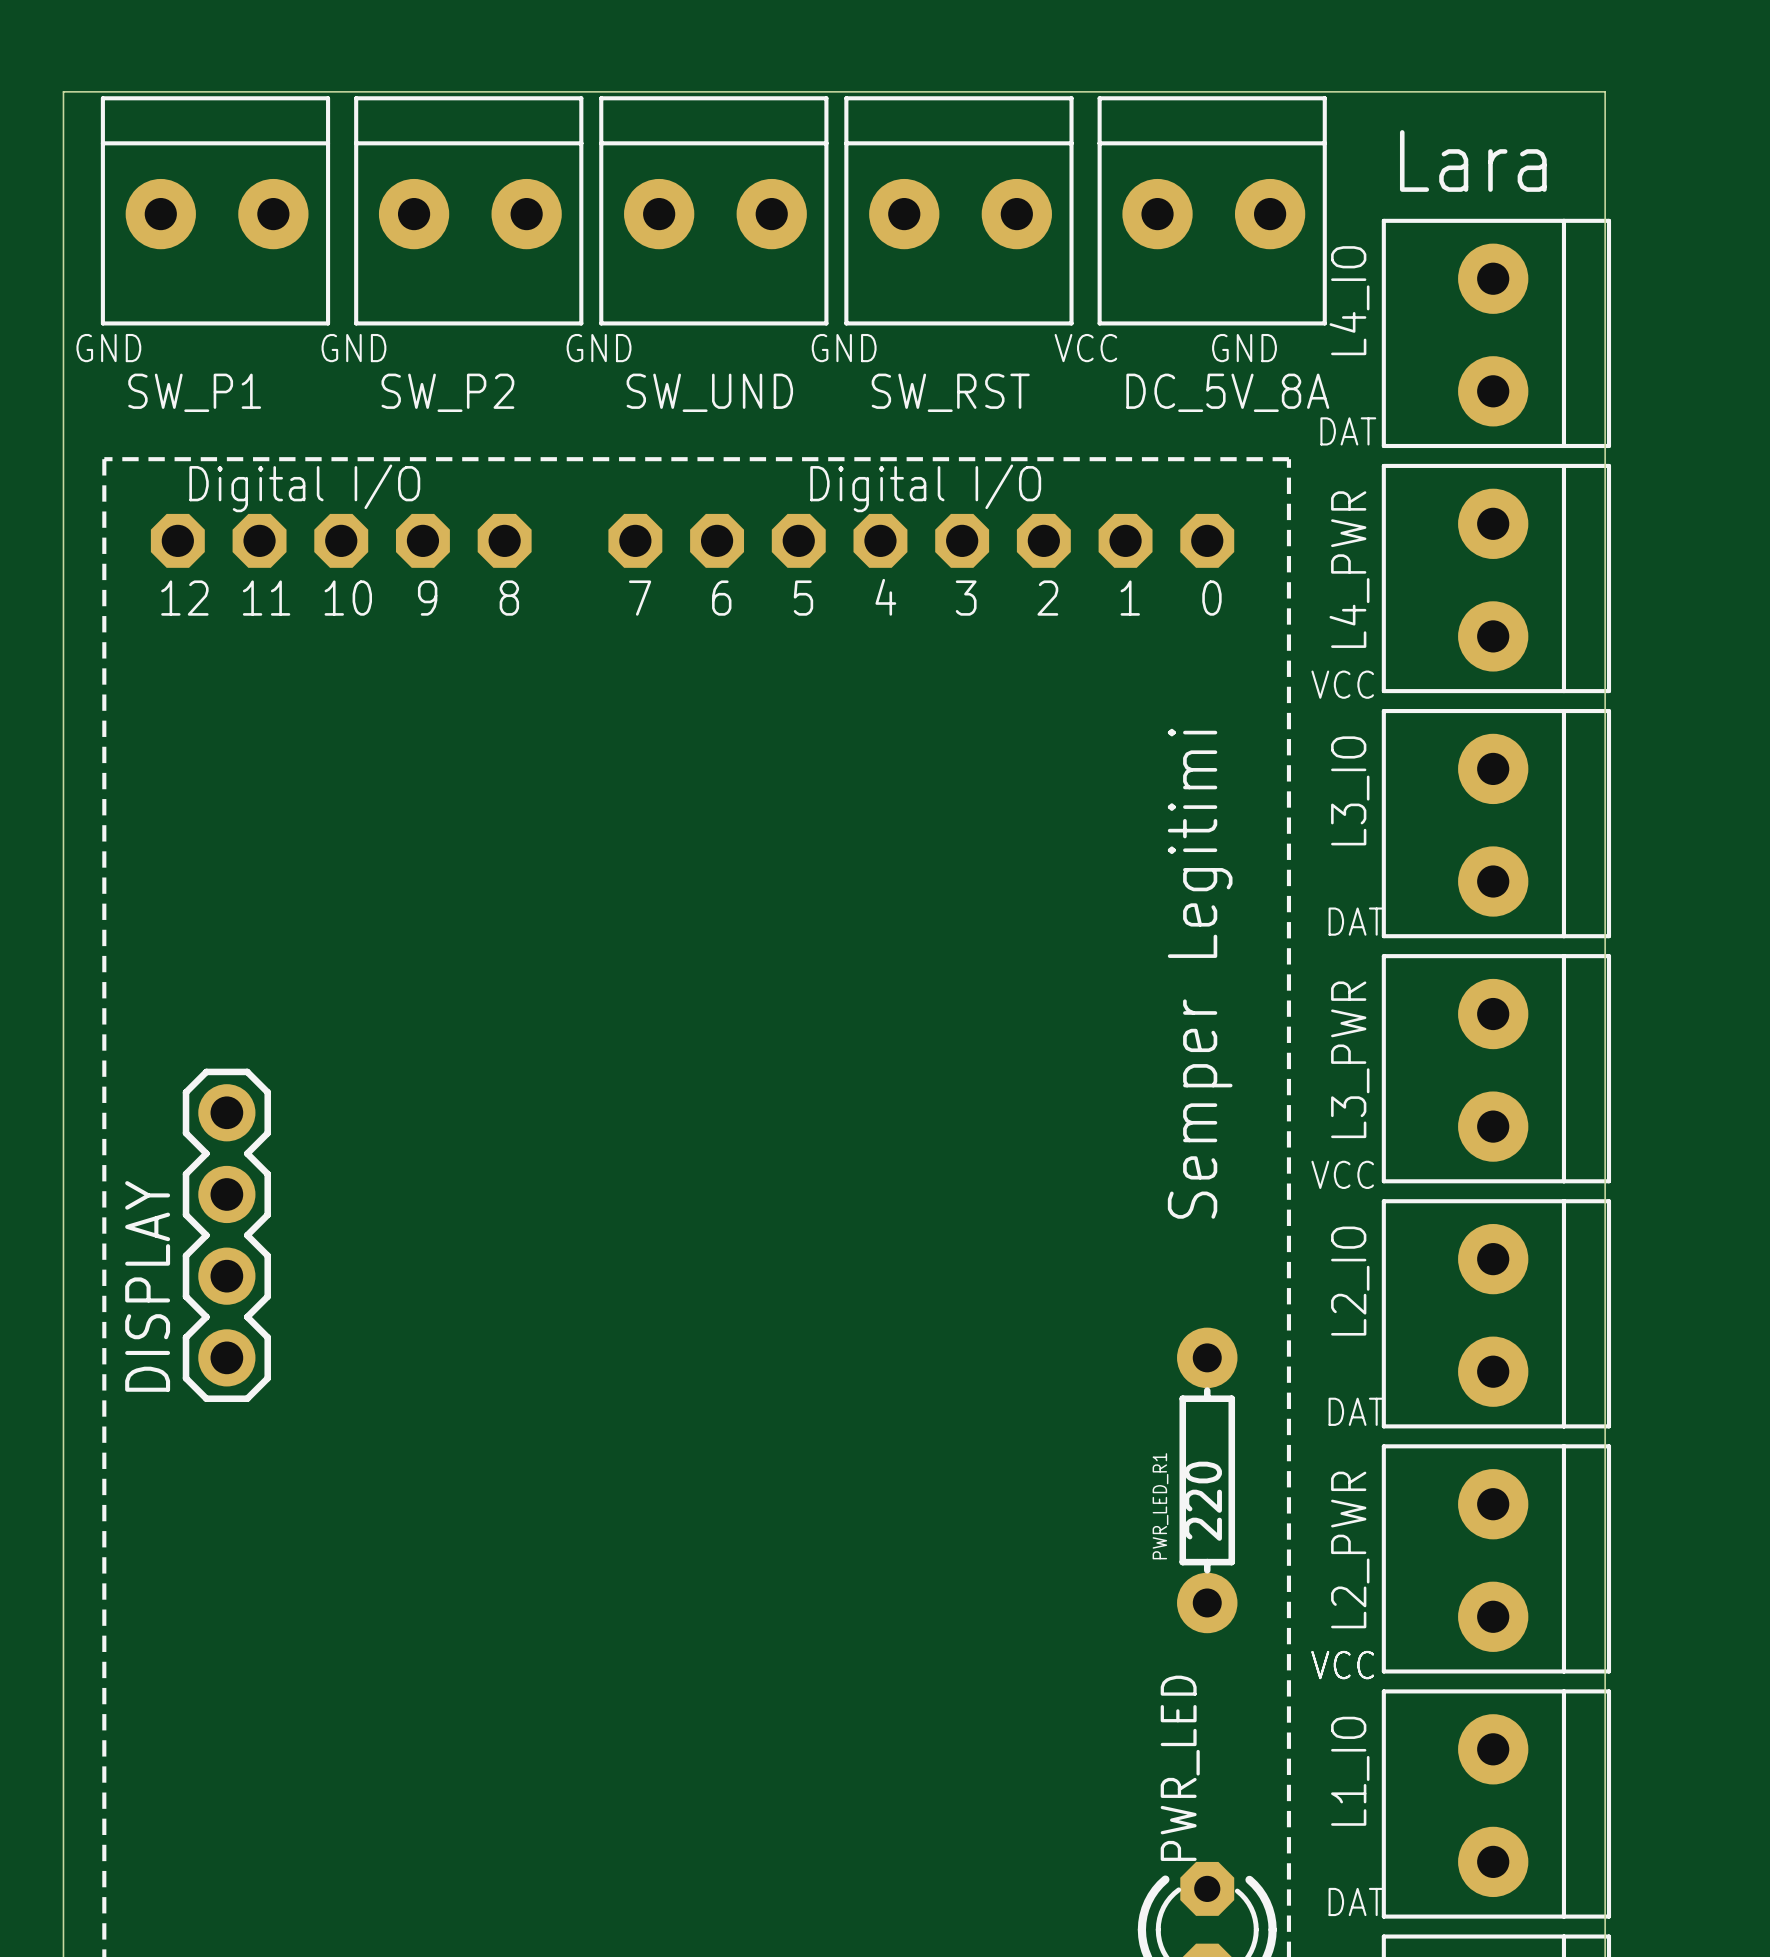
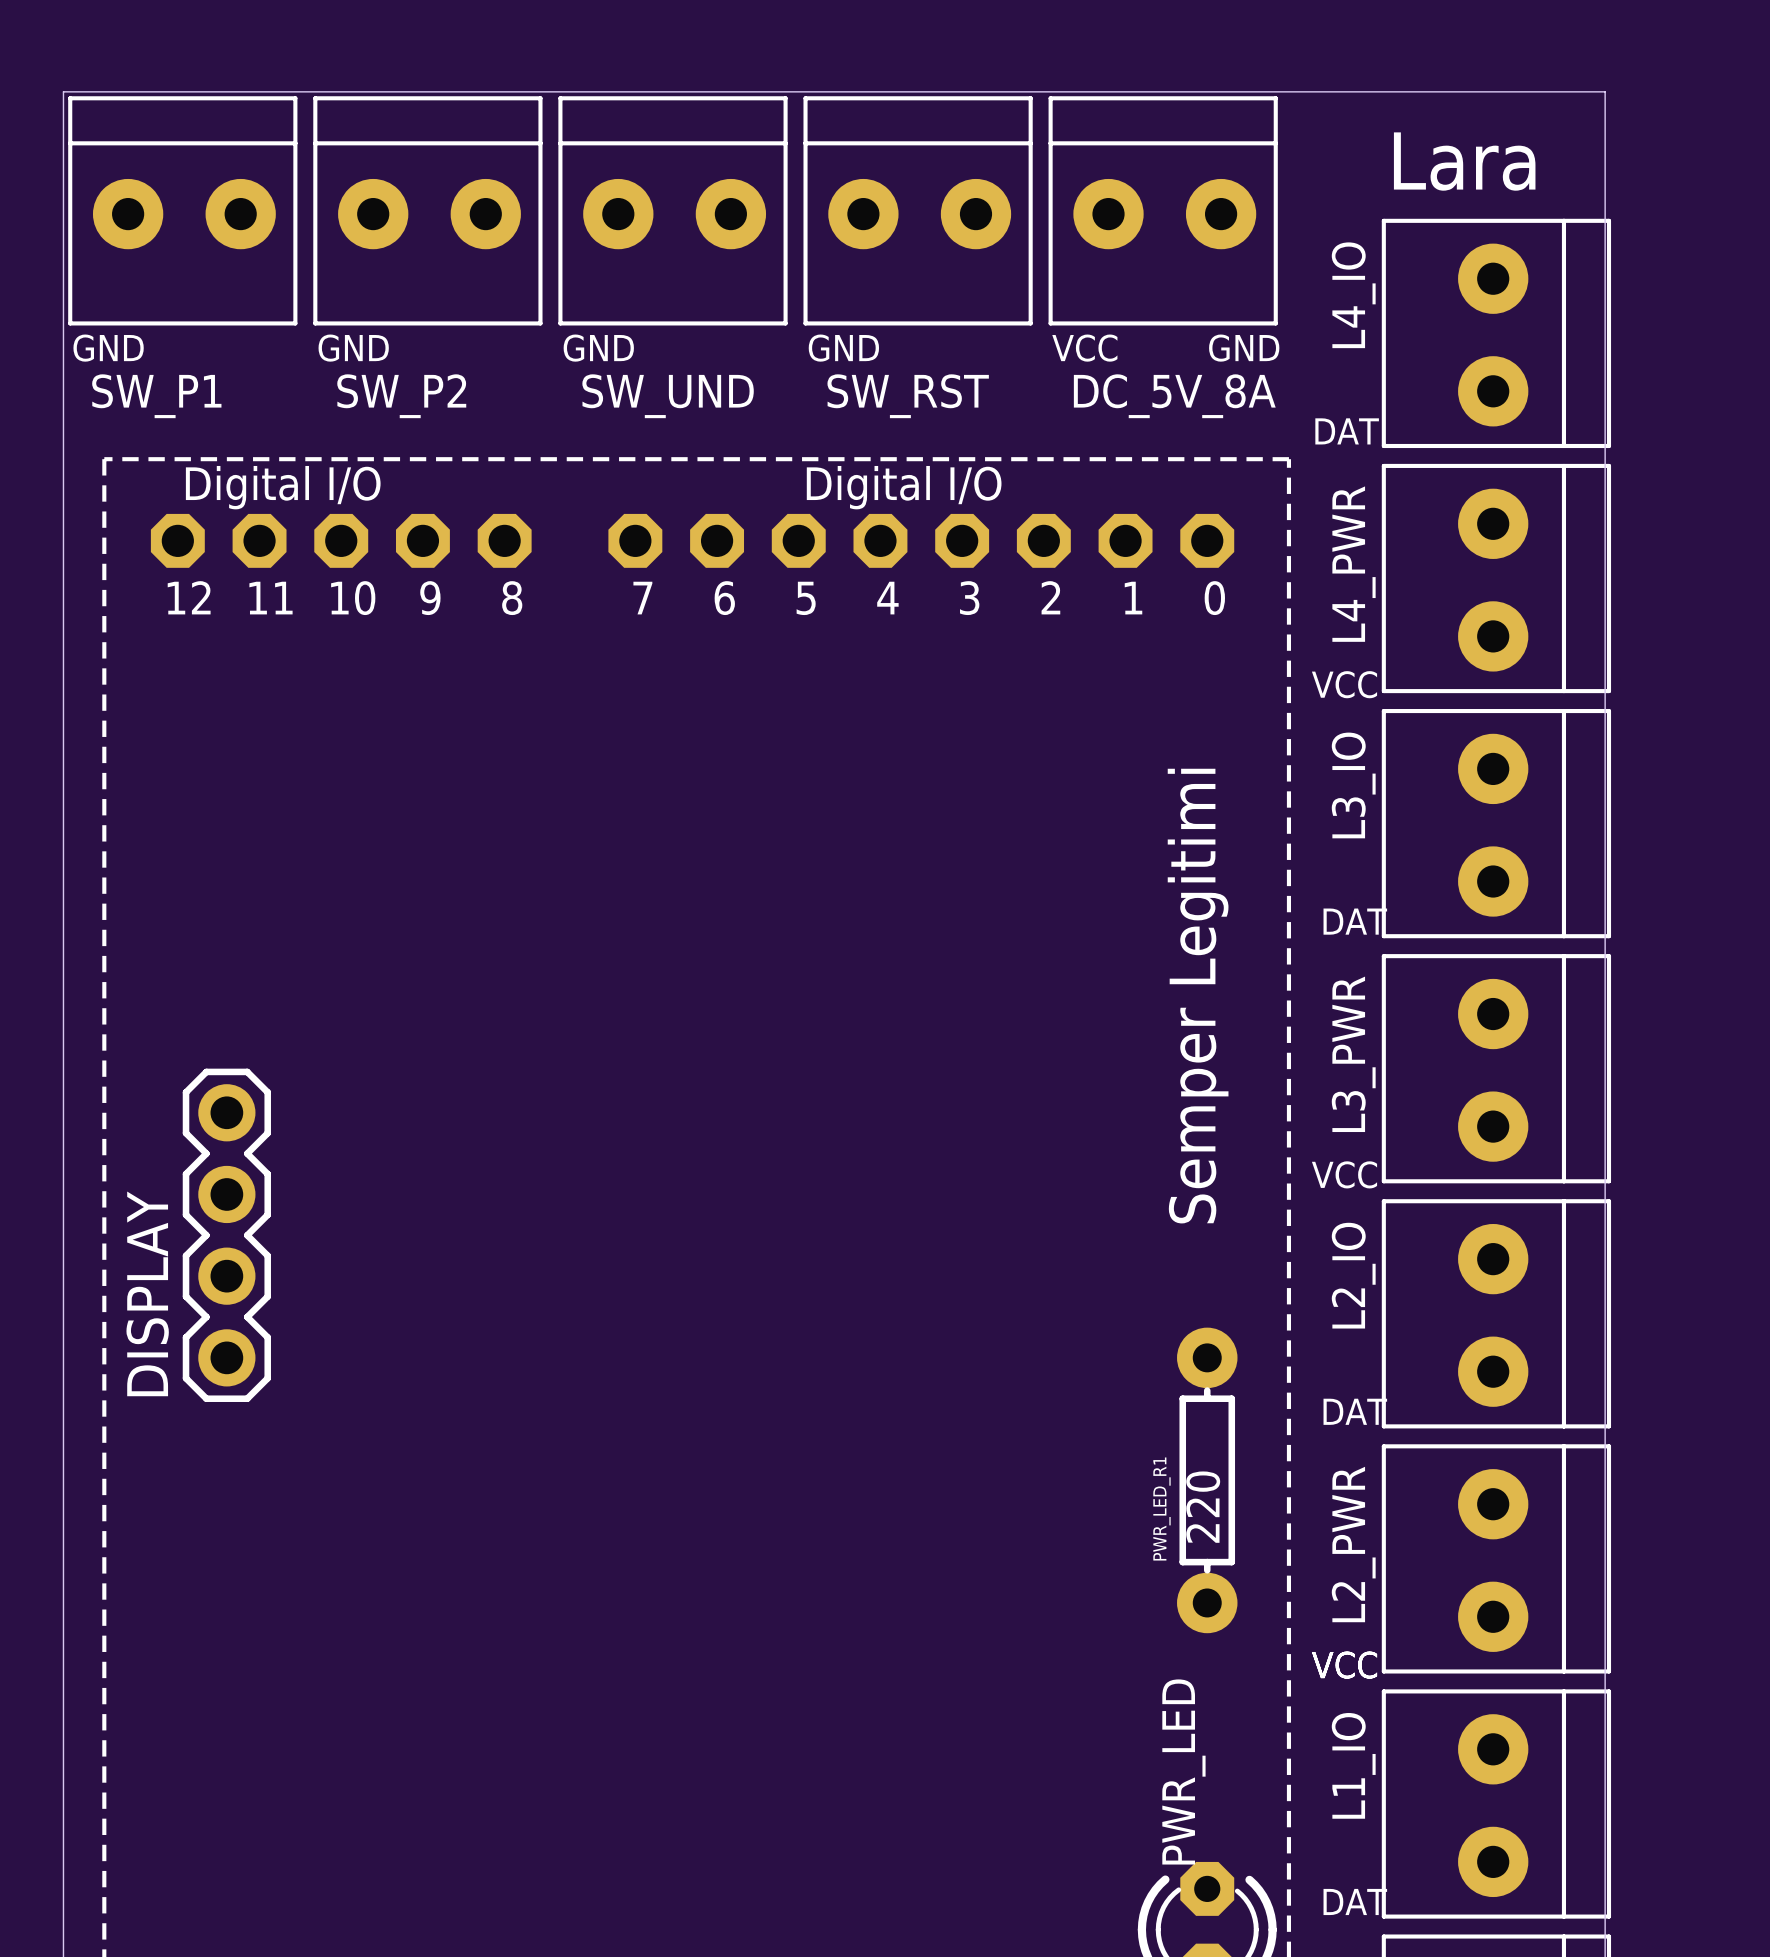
SW_P1 position: (215, 210) -> (182, 210)
SW_P2 position: (468, 210) -> (427, 210)
SW_UND position: (713, 210) -> (672, 210)
SW_RST position: (958, 210) -> (918, 210)
DC_5V_8A position: (1212, 210) -> (1163, 210)

